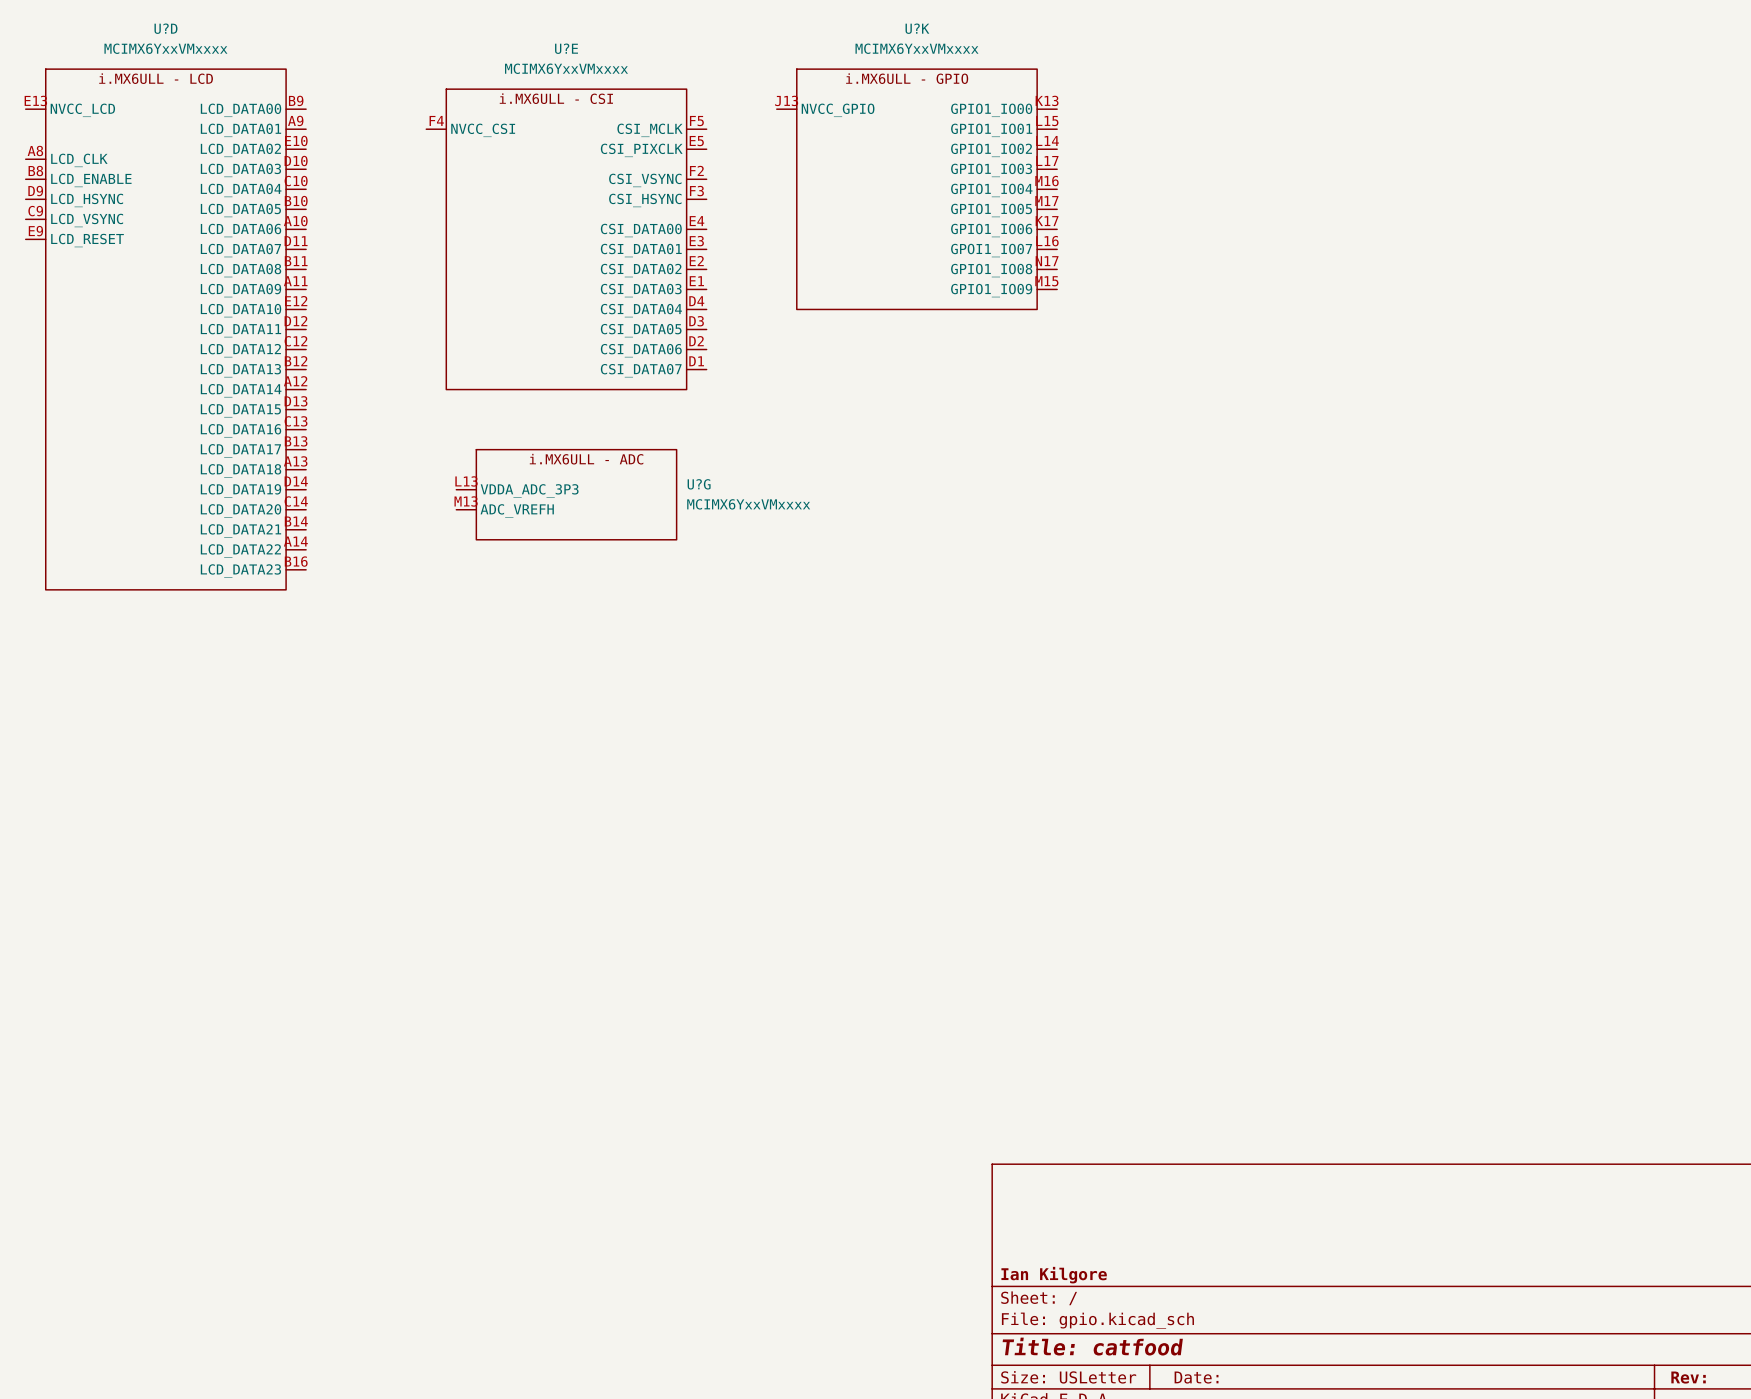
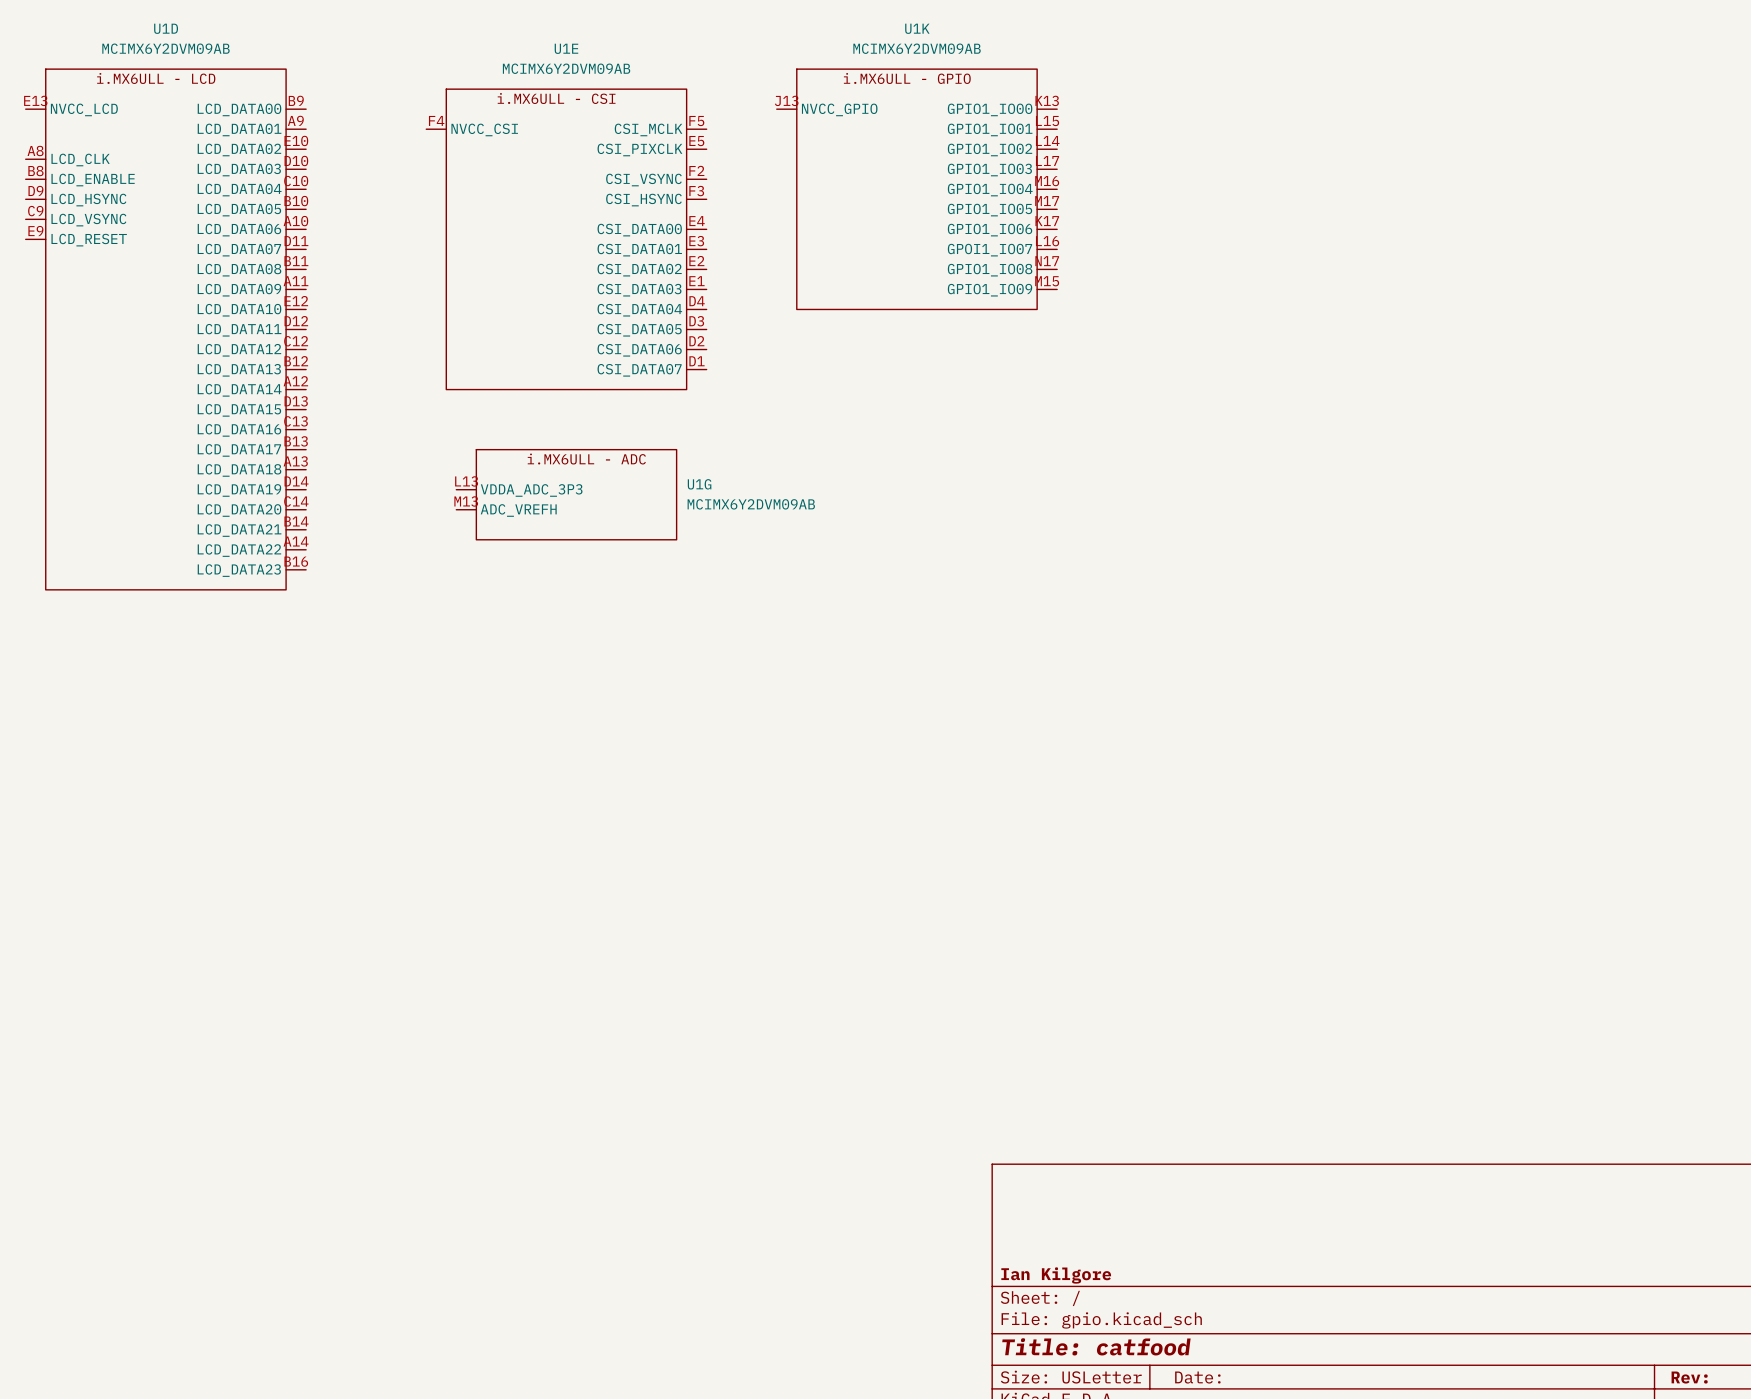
U?D name: U?D (165, 28) -> U1D (166, 28)
U?K name: U?K (917, 28) -> U1K (917, 28)
U?D value: MCIMX6YxxVMxxxx (165, 48) -> MCIMX6Y2DVM09AB (165, 48)
U?E name: U?E (566, 48) -> U1E (566, 48)
U?K value: MCIMX6YxxVMxxxx (916, 48) -> MCIMX6Y2DVM09AB (917, 48)
U?E value: MCIMX6YxxVMxxxx (566, 68) -> MCIMX6Y2DVM09AB (566, 68)
U?G name: U?G (699, 484) -> U1G (699, 484)
U?G value: MCIMX6YxxVMxxxx (748, 504) -> MCIMX6Y2DVM09AB (751, 504)

